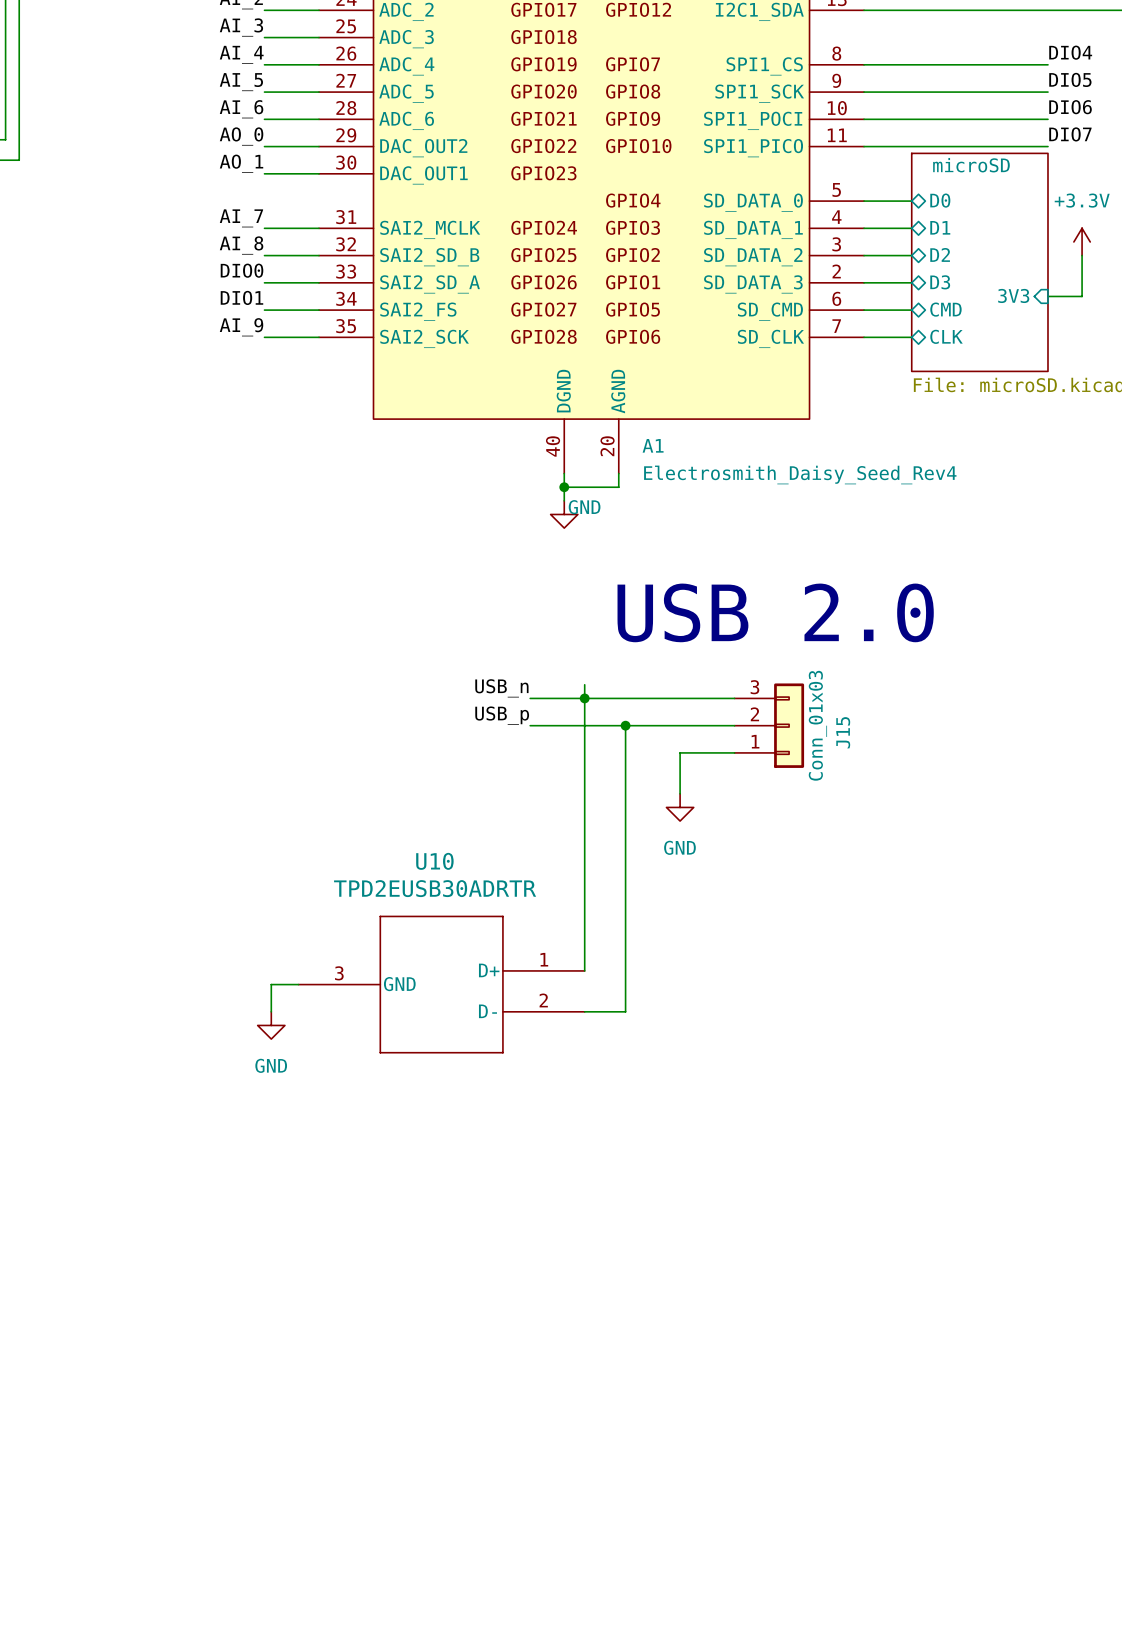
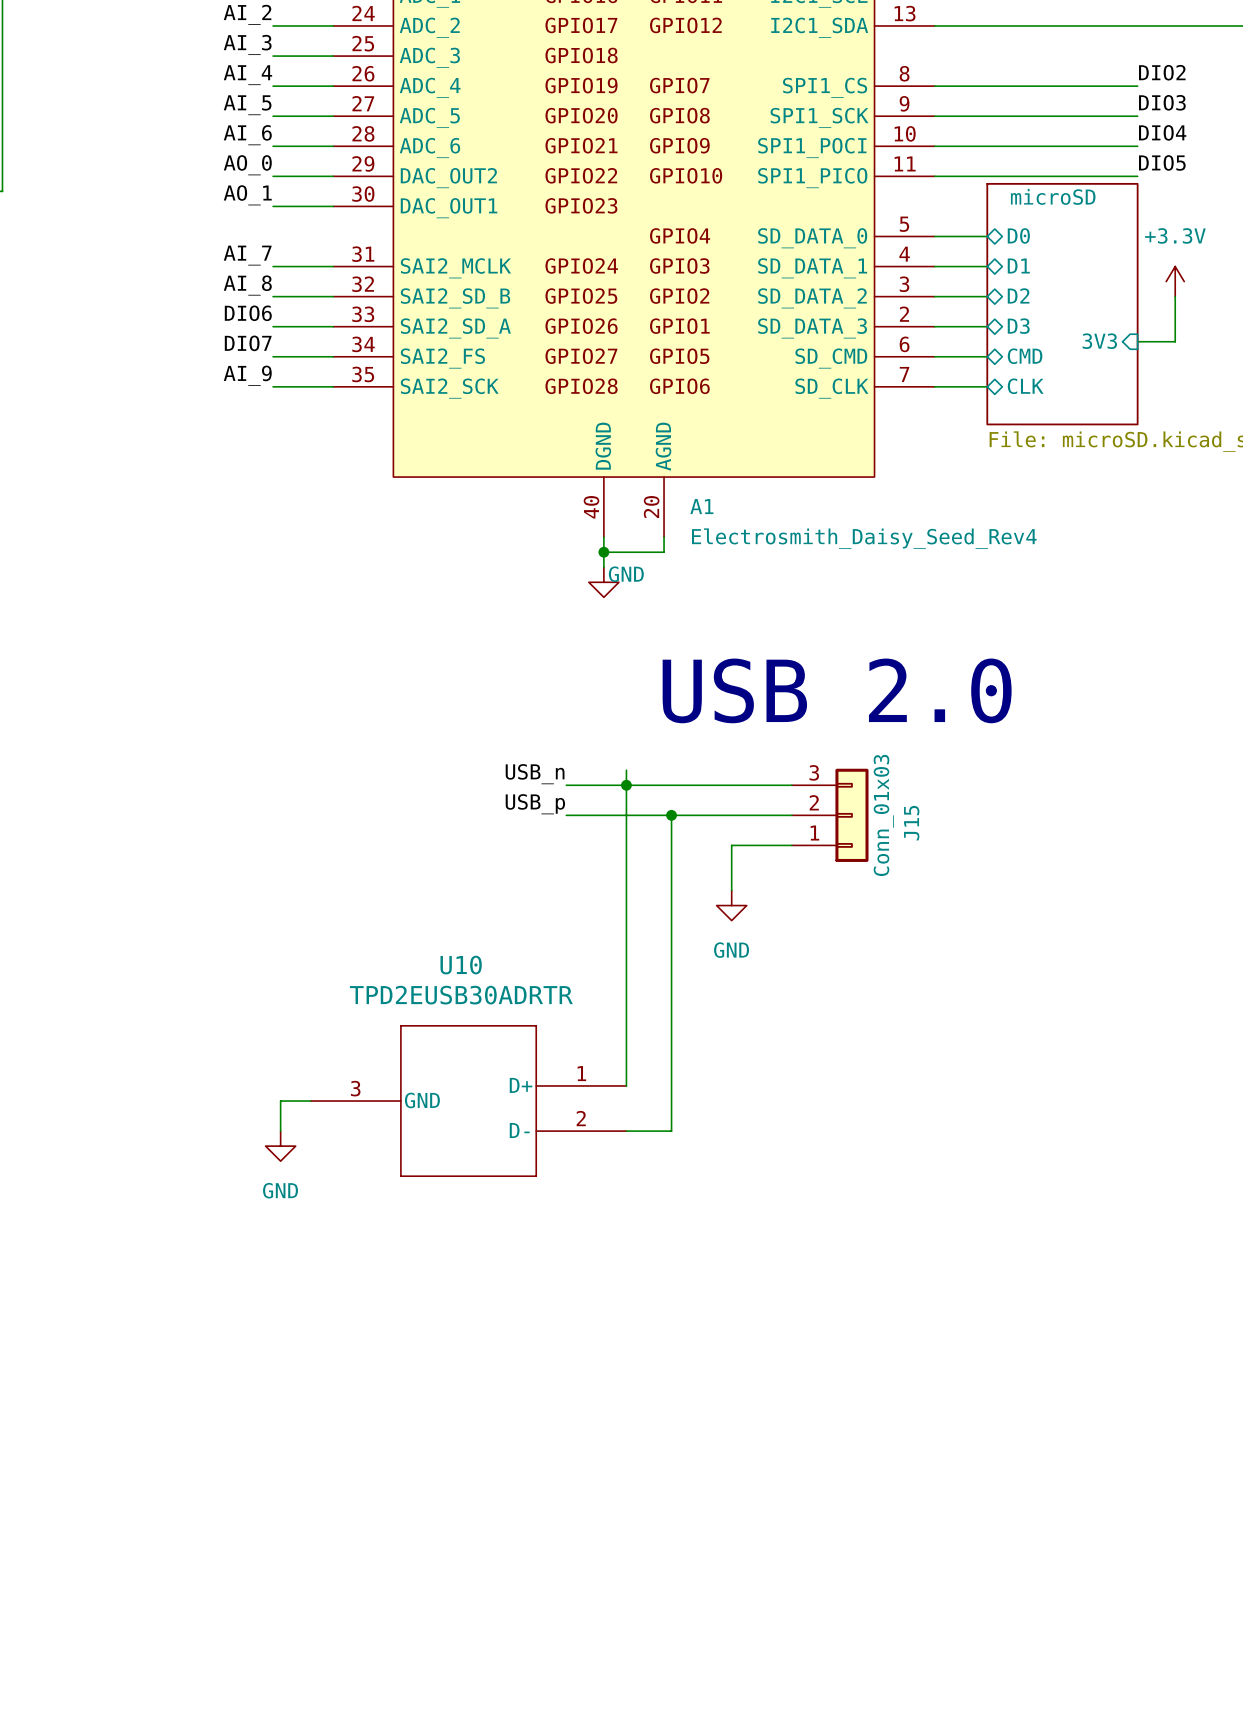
label: DIO4 (1070, 52) -> DIO2 (1162, 72)
label: DIO5 (1070, 79) -> DIO3 (1162, 102)
label: DIO6 (1070, 107) -> DIO4 (1162, 132)
label: DIO7 (1070, 134) -> DIO5 (1162, 162)
label: DIO0 (242, 270) -> DIO6 (248, 313)
label: DIO1 (241, 297) -> DIO7 (248, 343)

